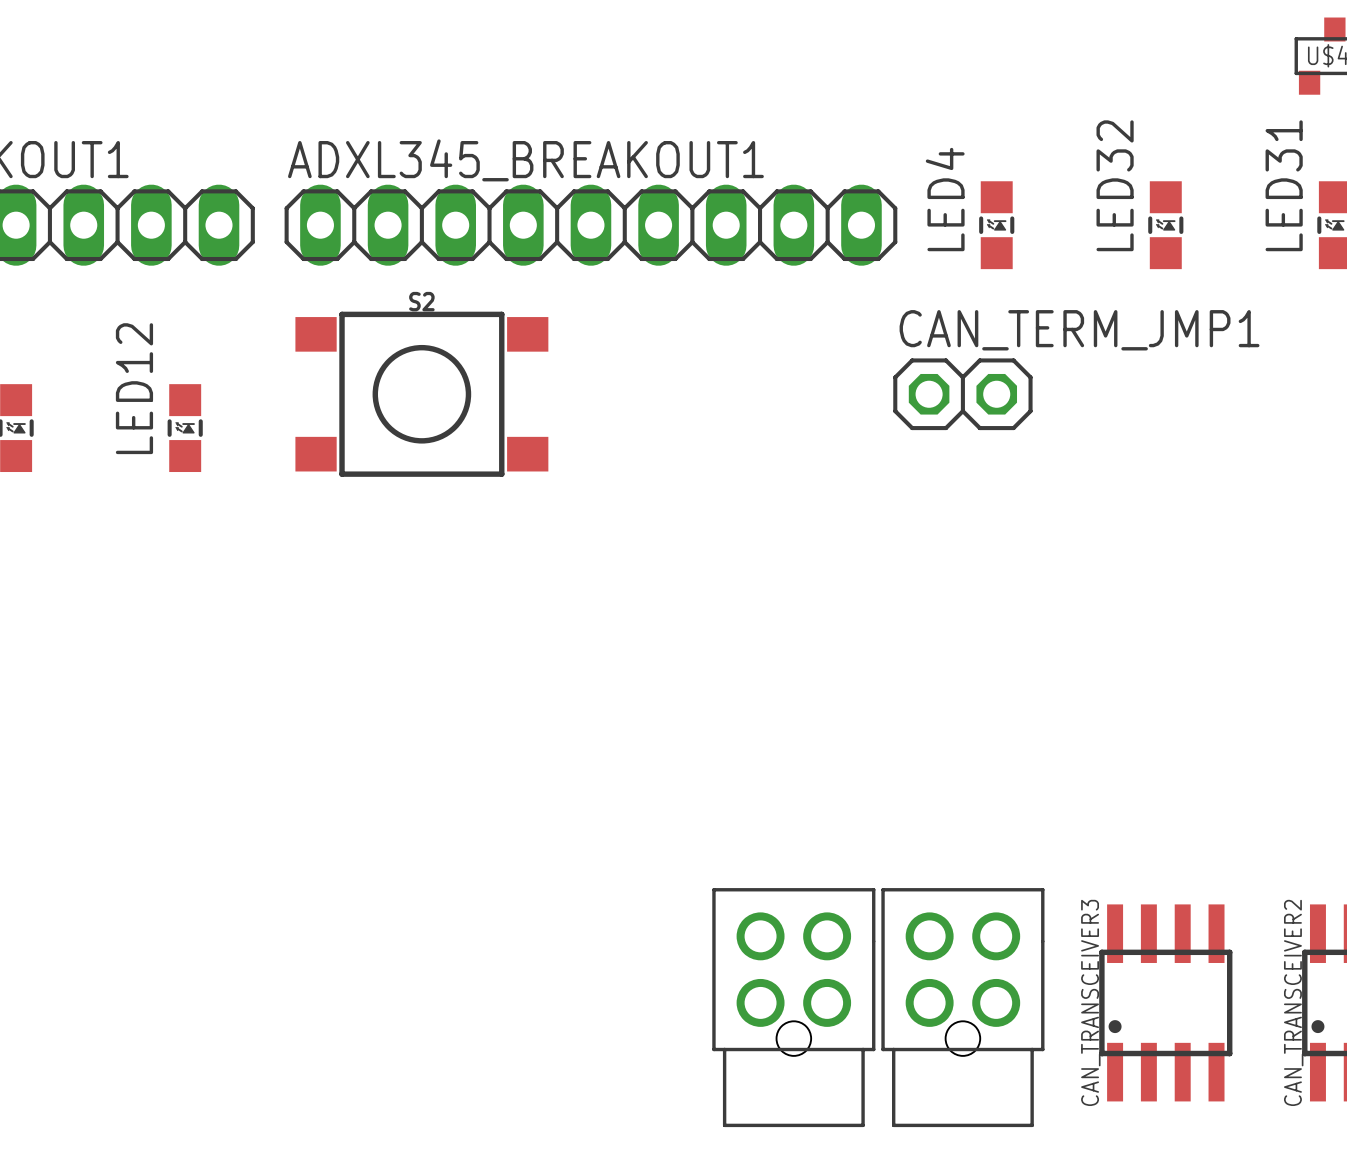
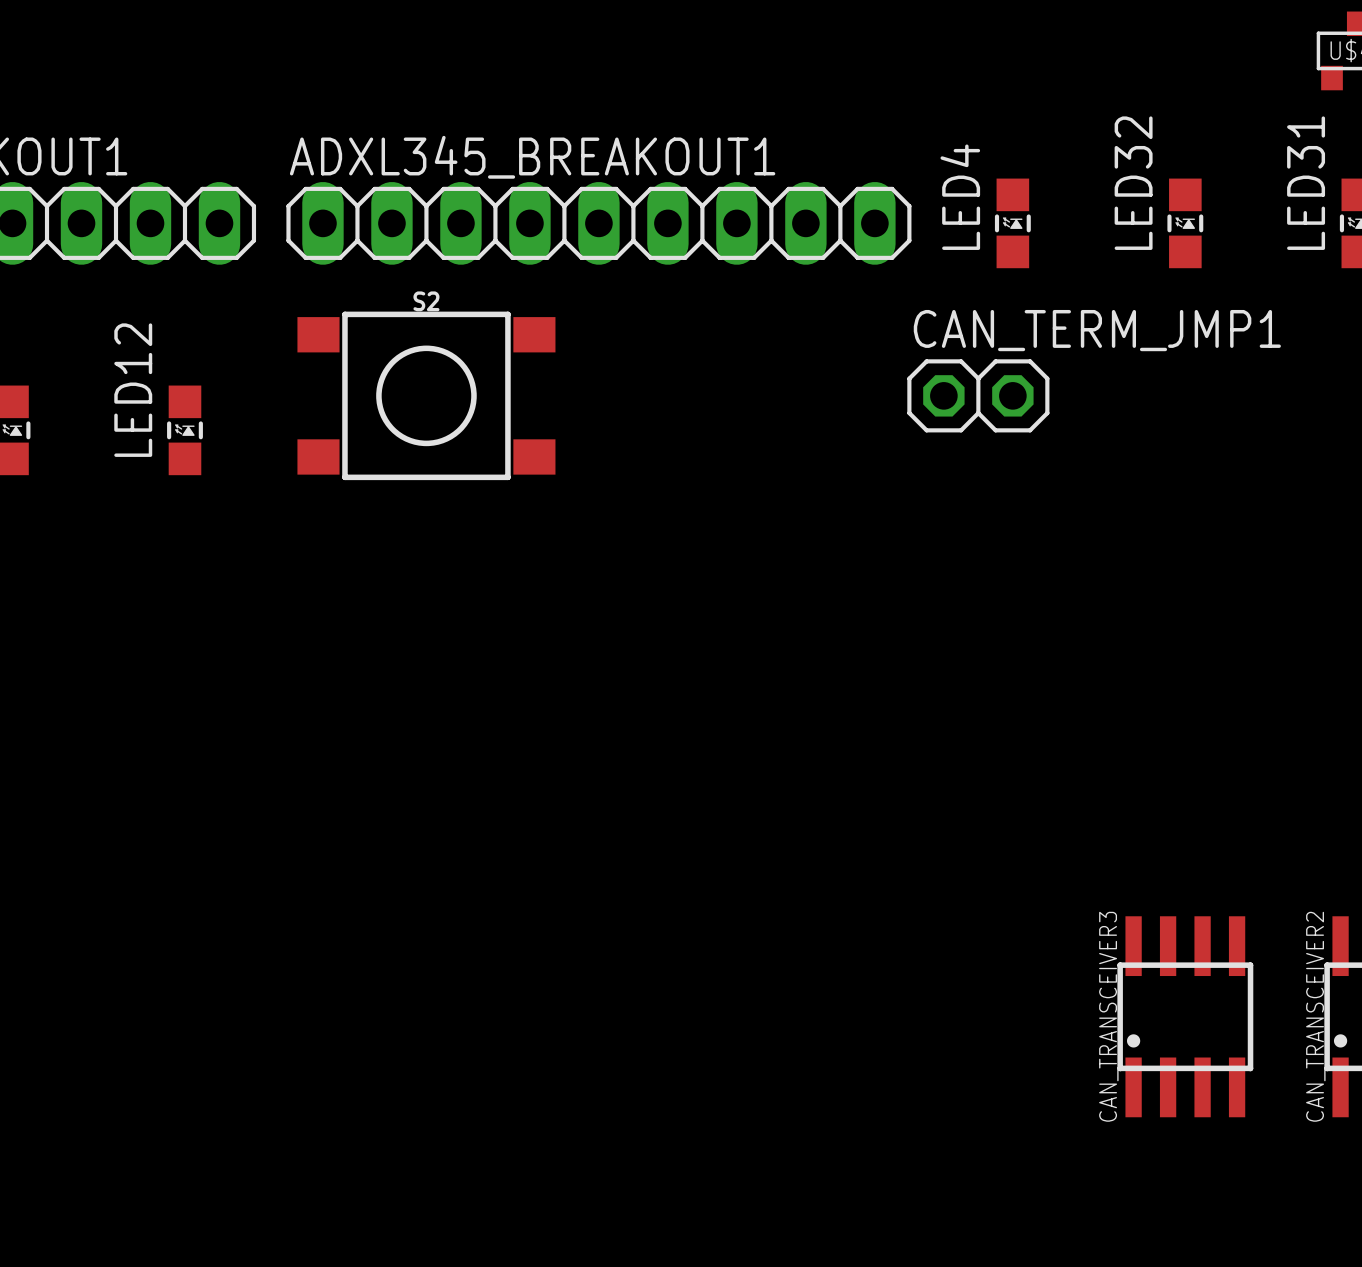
part: (793, 1007) -> none
part: (962, 1007) -> none

